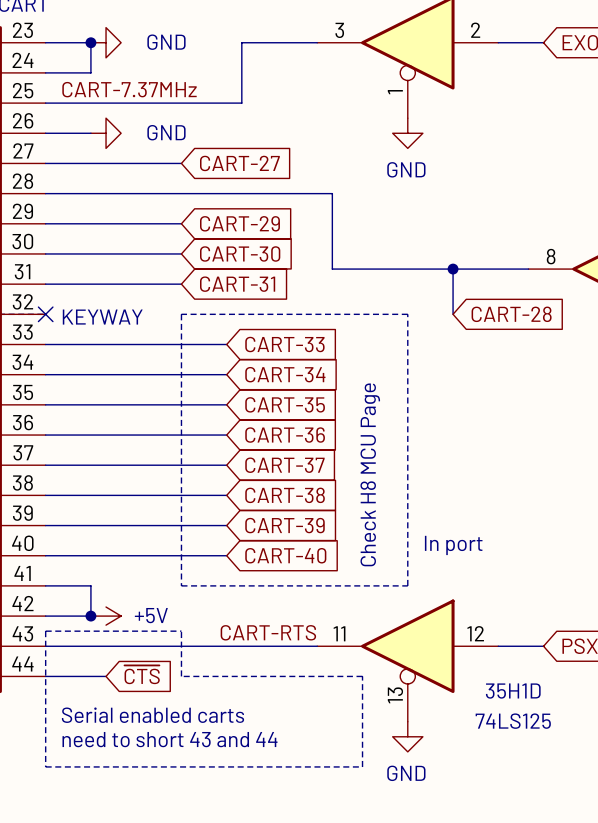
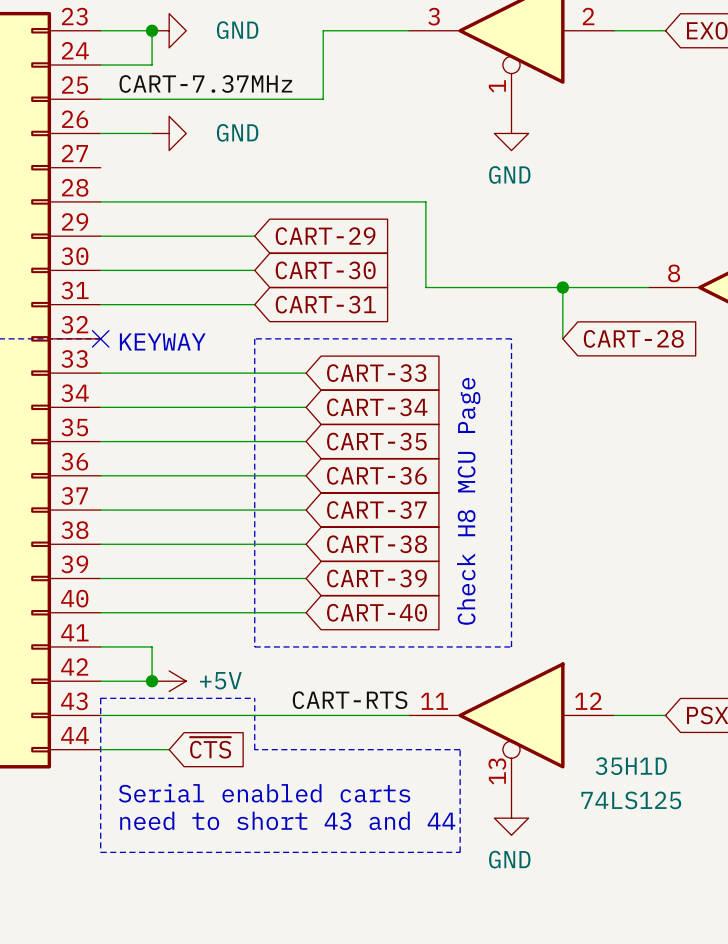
wire: (45, 163) (181, 163) -> none
global label: CART-27 (239, 163) -> none
text: In port (453, 545) -> none

